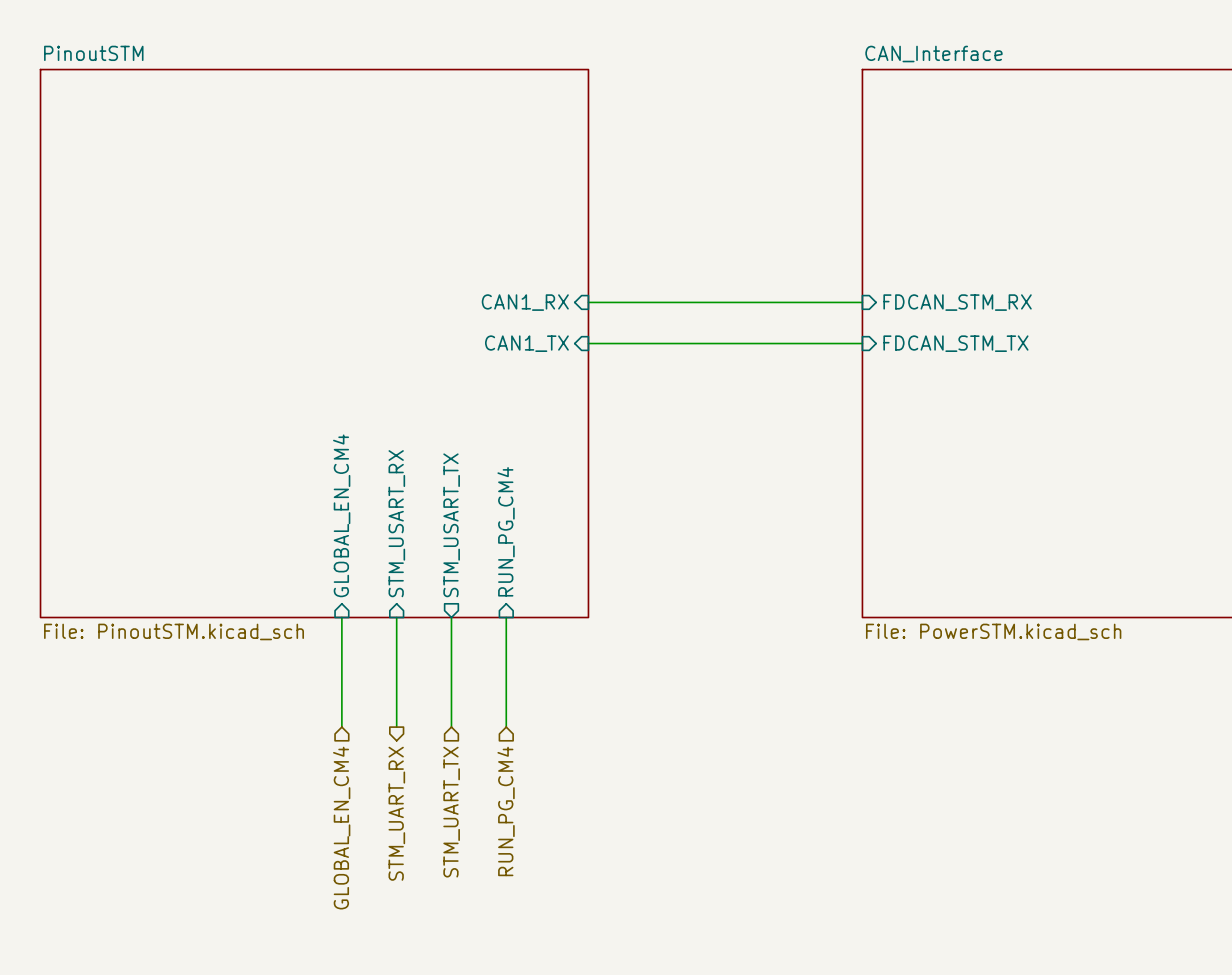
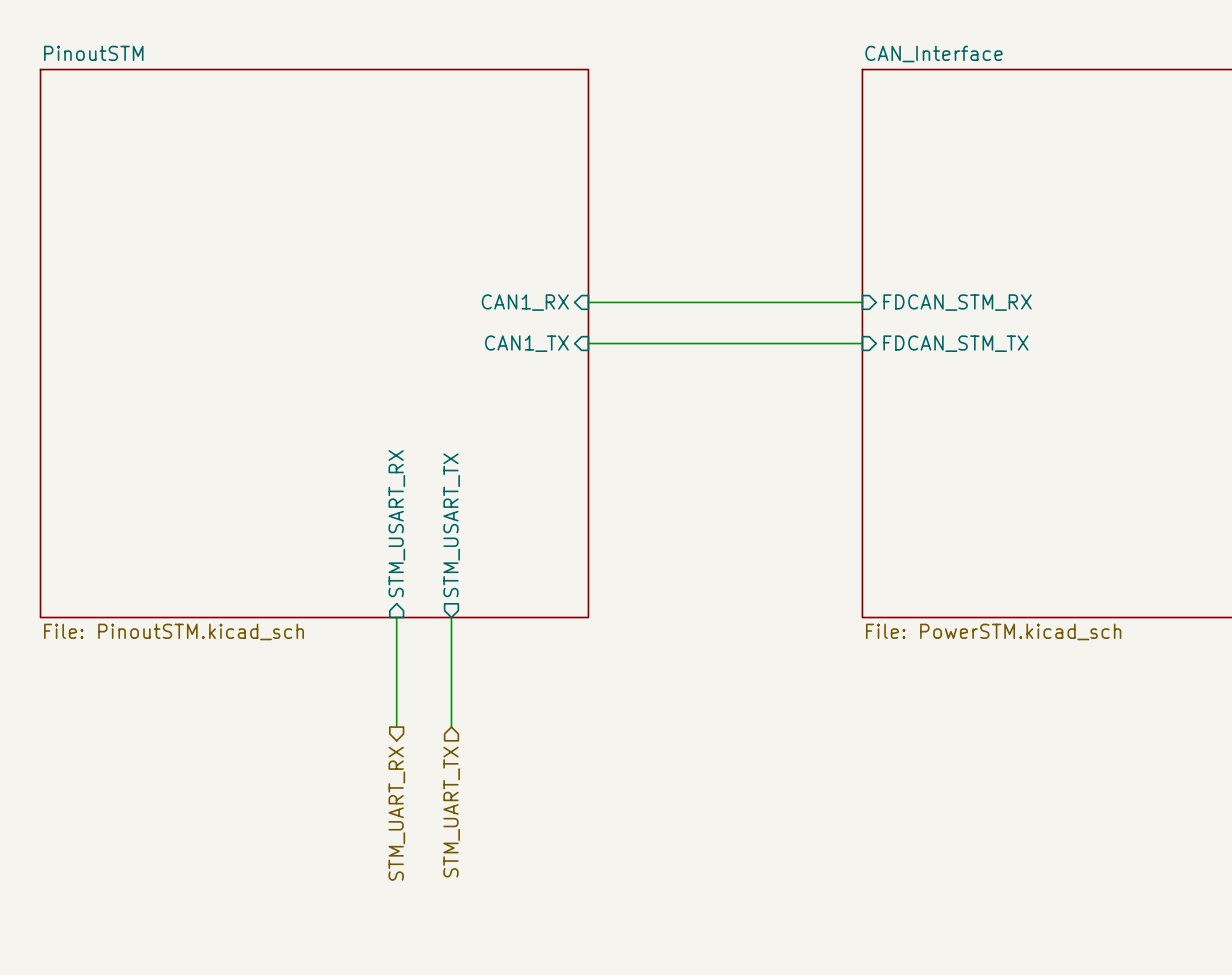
sheet pin: GLOBAL_EN_CM4 (341, 515) -> none
sheet pin: RUN_PG_CM4 (506, 531) -> none
wire: (341, 617) (341, 727) -> none
wire: (506, 617) (506, 727) -> none
hierarchical label: RUN_PG_CM4 (506, 811) -> none
hierarchical label: GLOBAL_EN_CM4 (341, 828) -> none

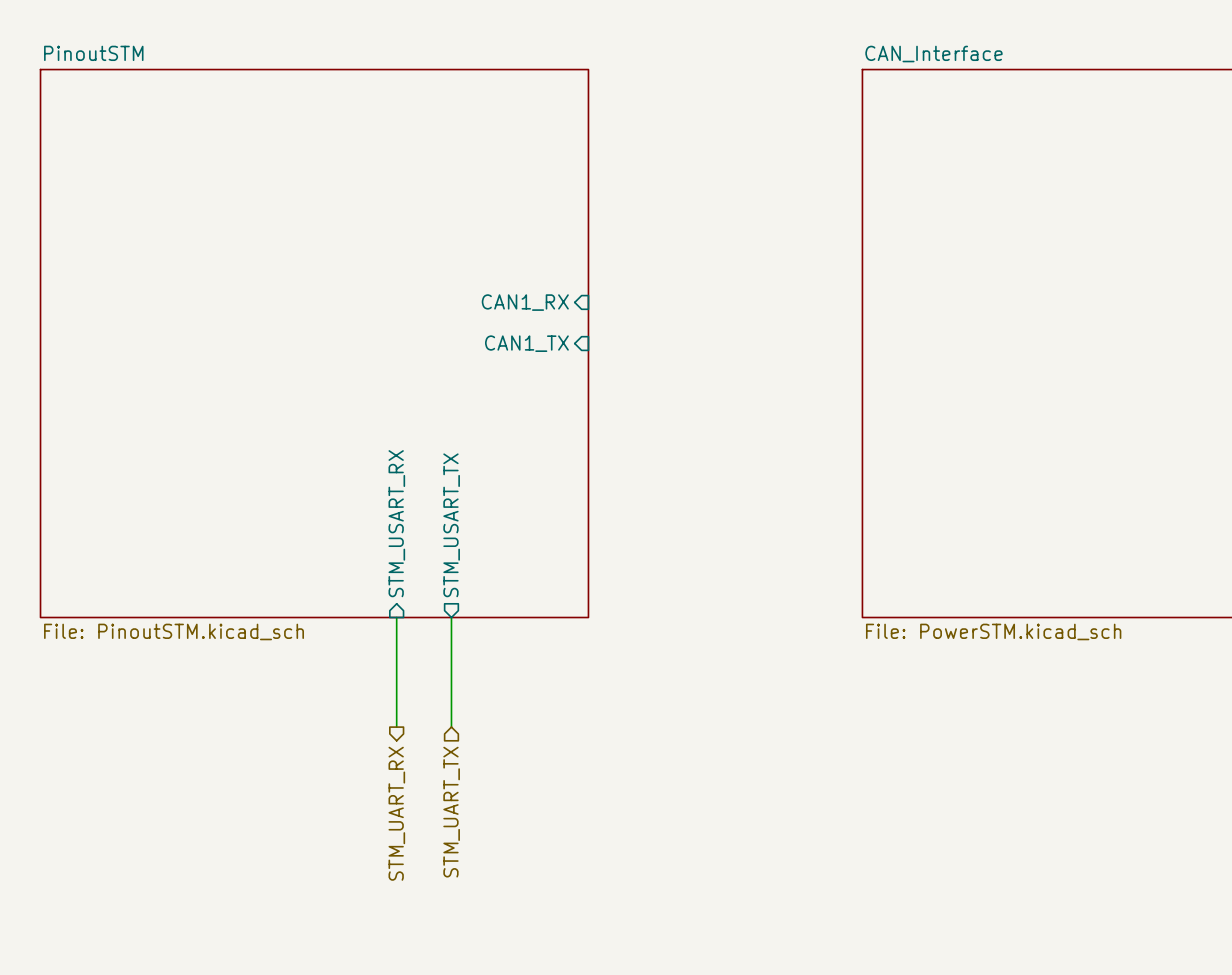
wire: (588, 302) (862, 302) -> none
sheet pin: FDCAN_STM_RX (957, 302) -> none
wire: (588, 343) (862, 343) -> none
sheet pin: FDCAN_STM_TX (955, 343) -> none

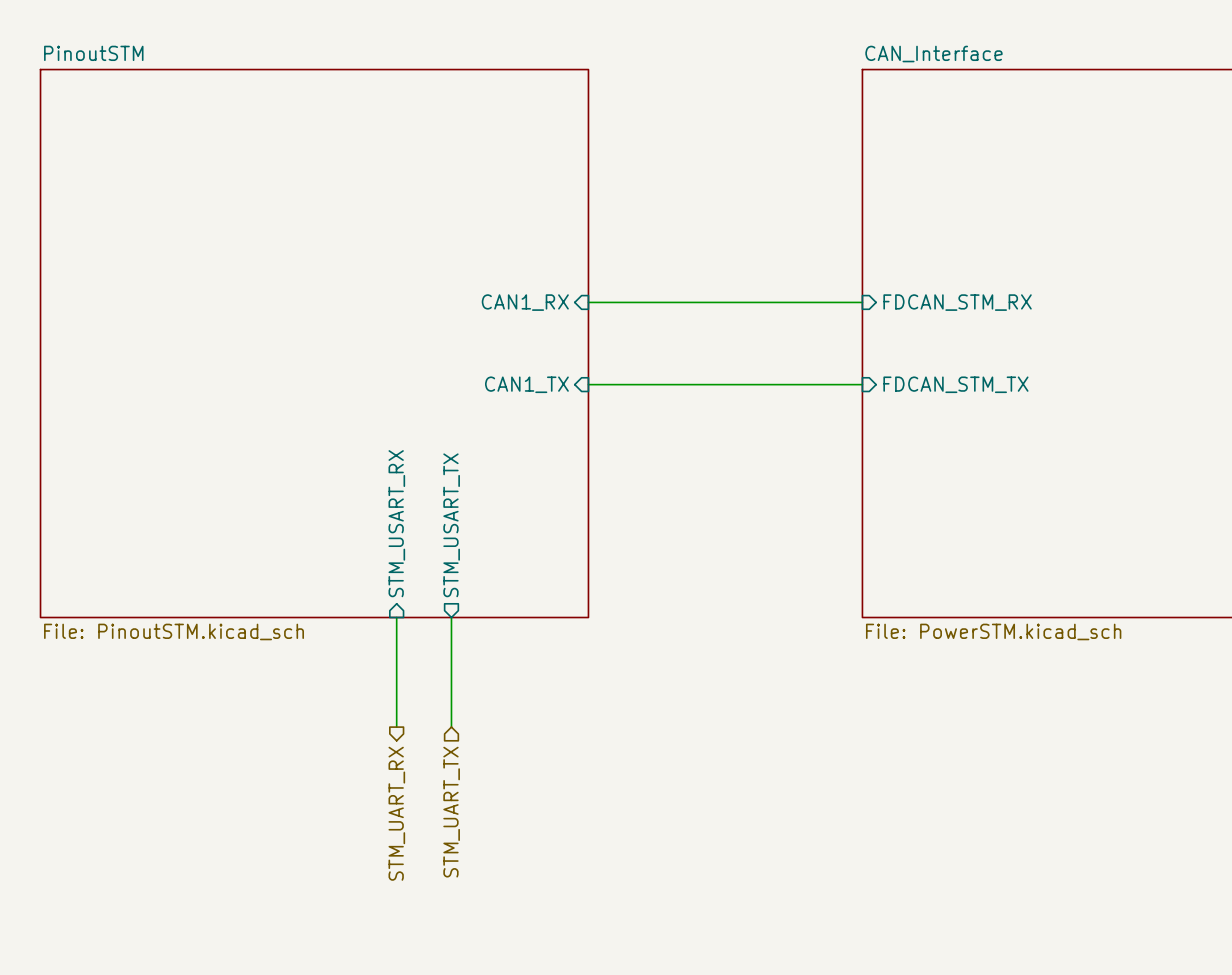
wire: none -> (588, 302) (862, 302)
sheet pin: none -> FDCAN_STM_RX (957, 302)
sheet pin position: CAN1_TX (526, 343) -> CAN1_TX (526, 384)
wire: none -> (588, 384) (862, 384)
sheet pin: none -> FDCAN_STM_TX (955, 384)

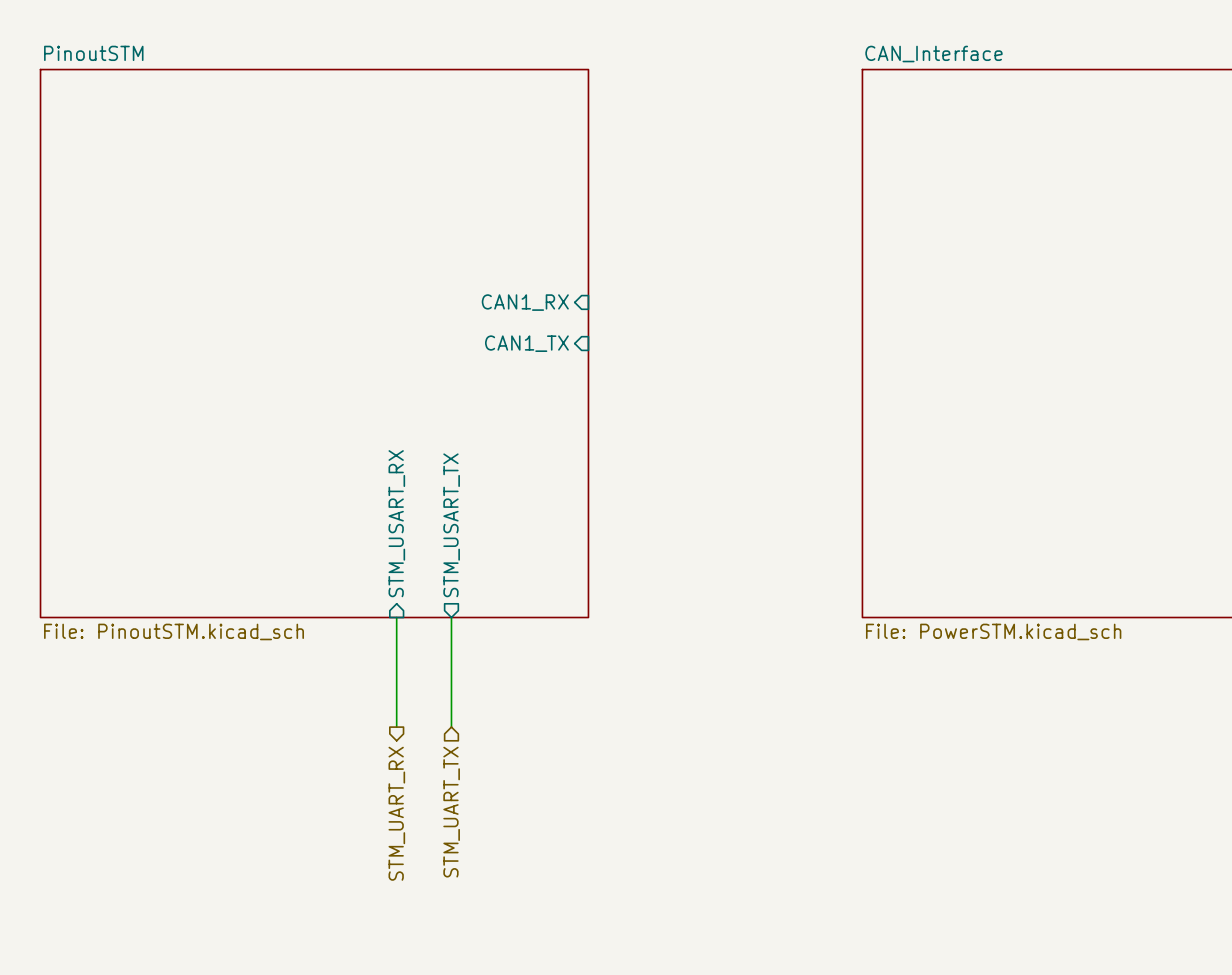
wire: (588, 302) (862, 302) -> none
sheet pin: FDCAN_STM_RX (957, 302) -> none
sheet pin position: CAN1_TX (526, 384) -> CAN1_TX (526, 343)
wire: (588, 384) (862, 384) -> none
sheet pin: FDCAN_STM_TX (955, 384) -> none

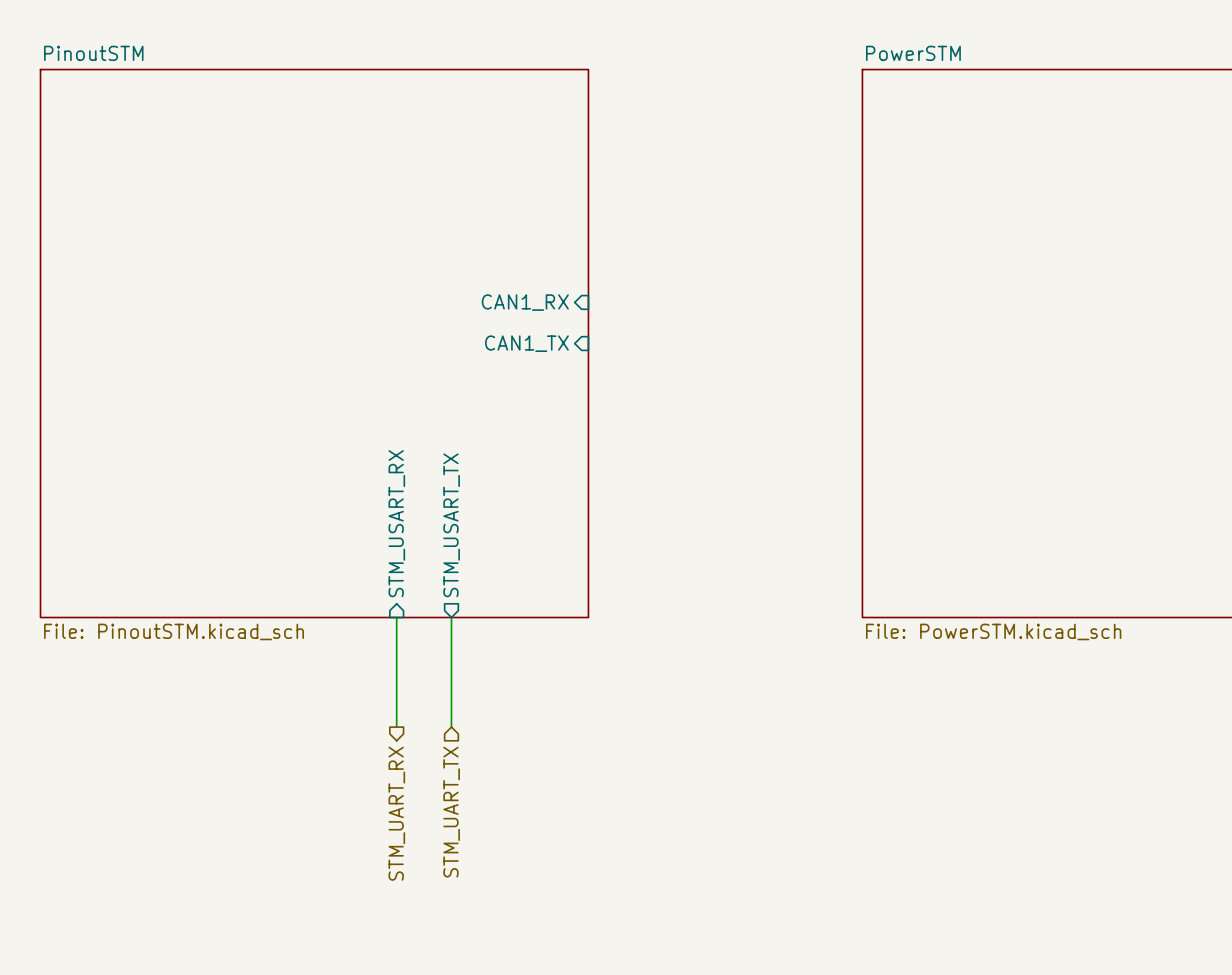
sheet CAN_Interface name: CAN_Interface (933, 54) -> PowerSTM (913, 53)

